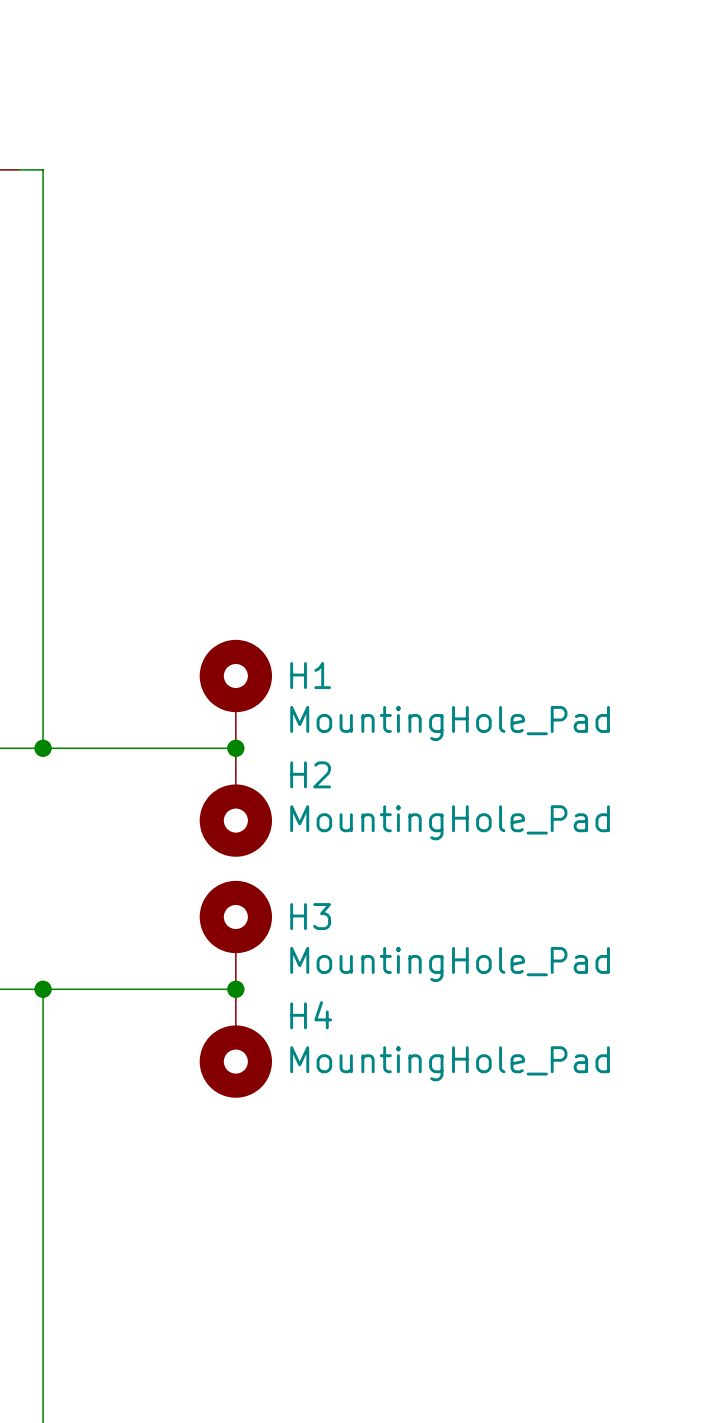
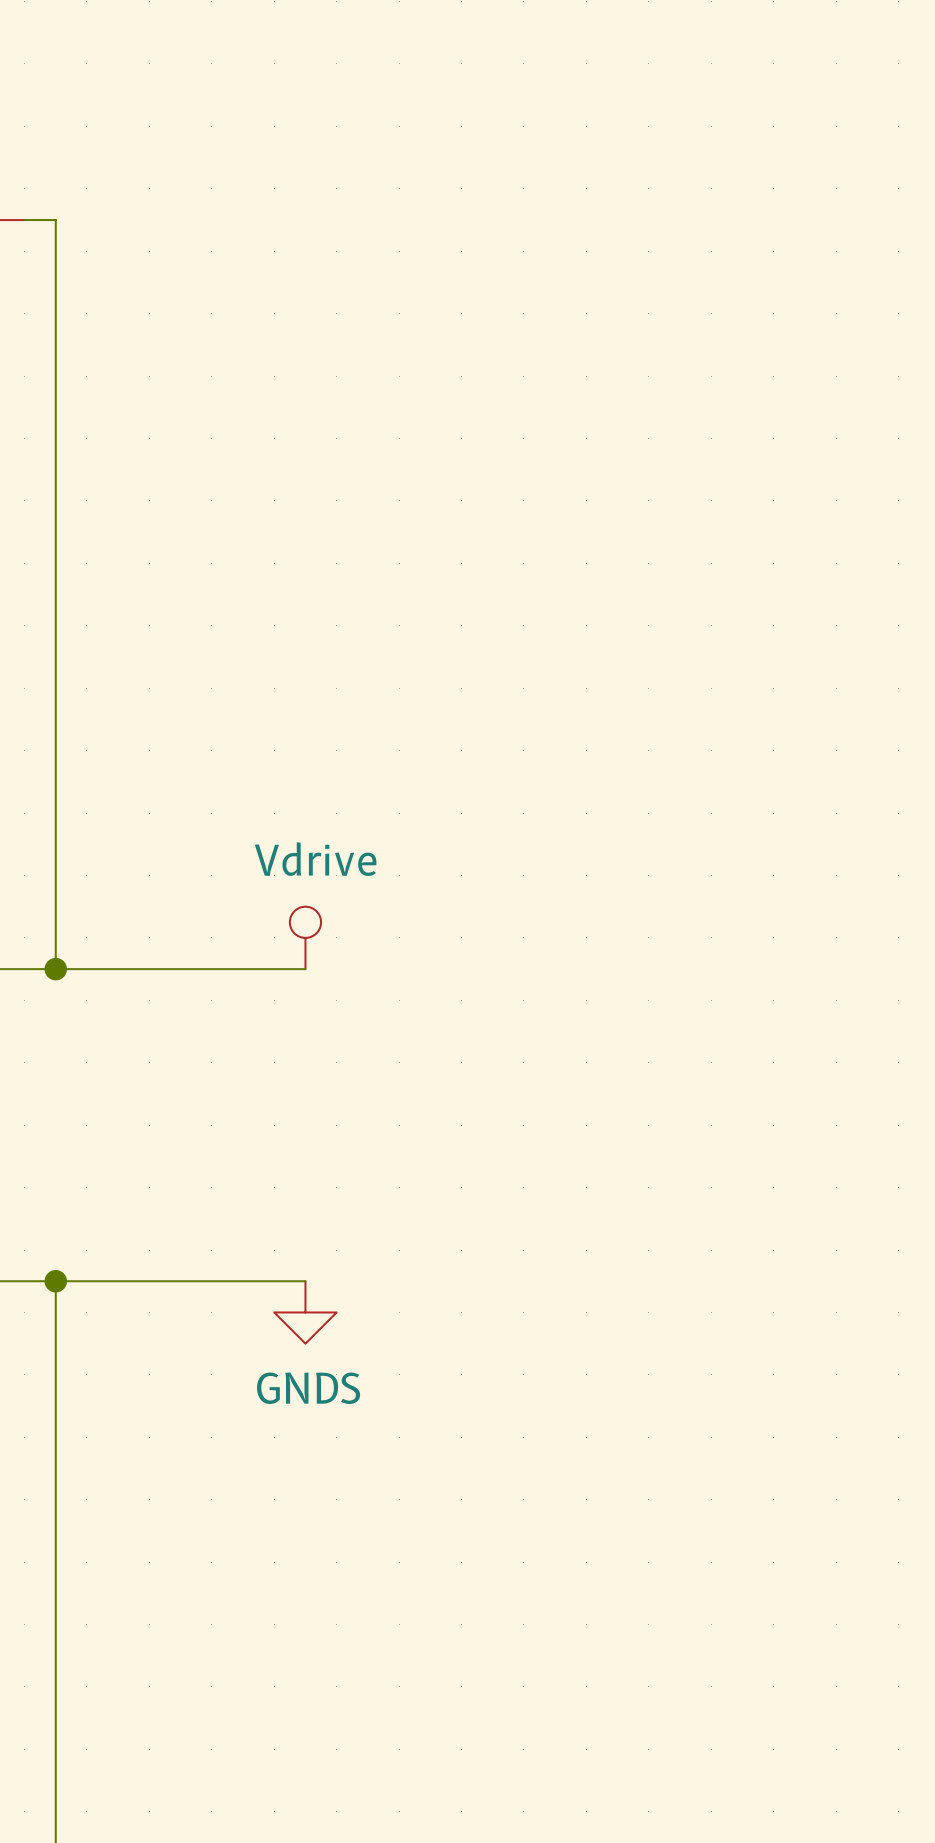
H1: MountingHole_Pad (235, 694) -> none
power symbol: none -> Vdrive (305, 937)
junction: (235, 748) -> none
H2: MountingHole_Pad (235, 802) -> none
H3: MountingHole_Pad (235, 935) -> none
junction: (235, 989) -> none
power symbol: none -> GNDS (305, 1312)
H4: MountingHole_Pad (235, 1043) -> none

